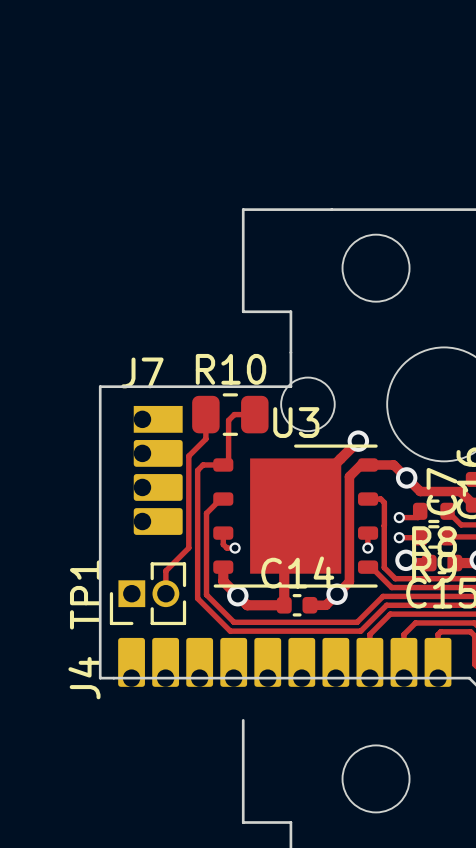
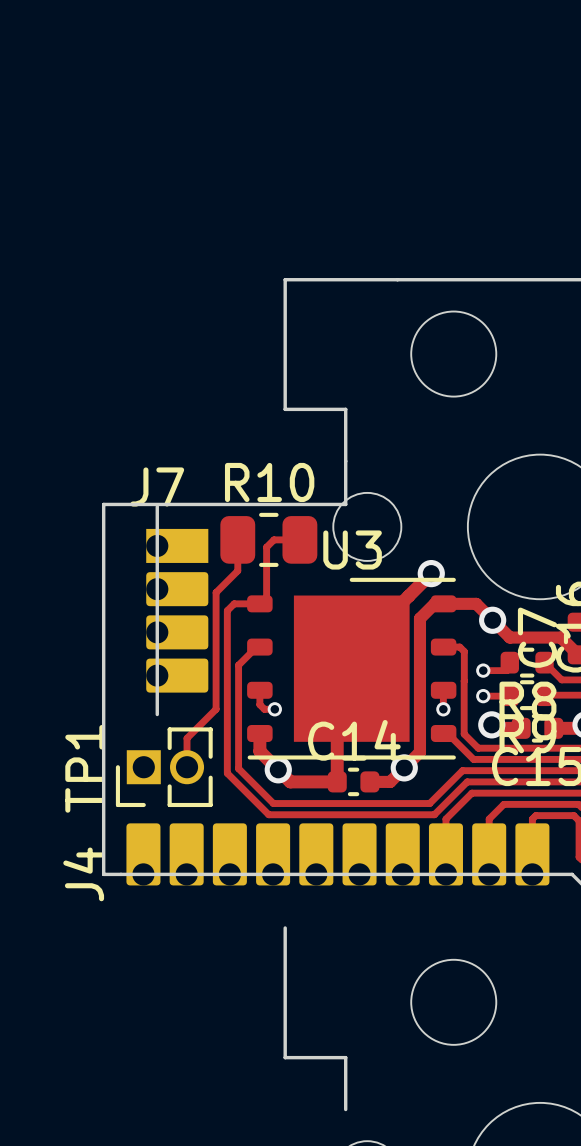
board edge: none -> (157, 507) (157, 714)

